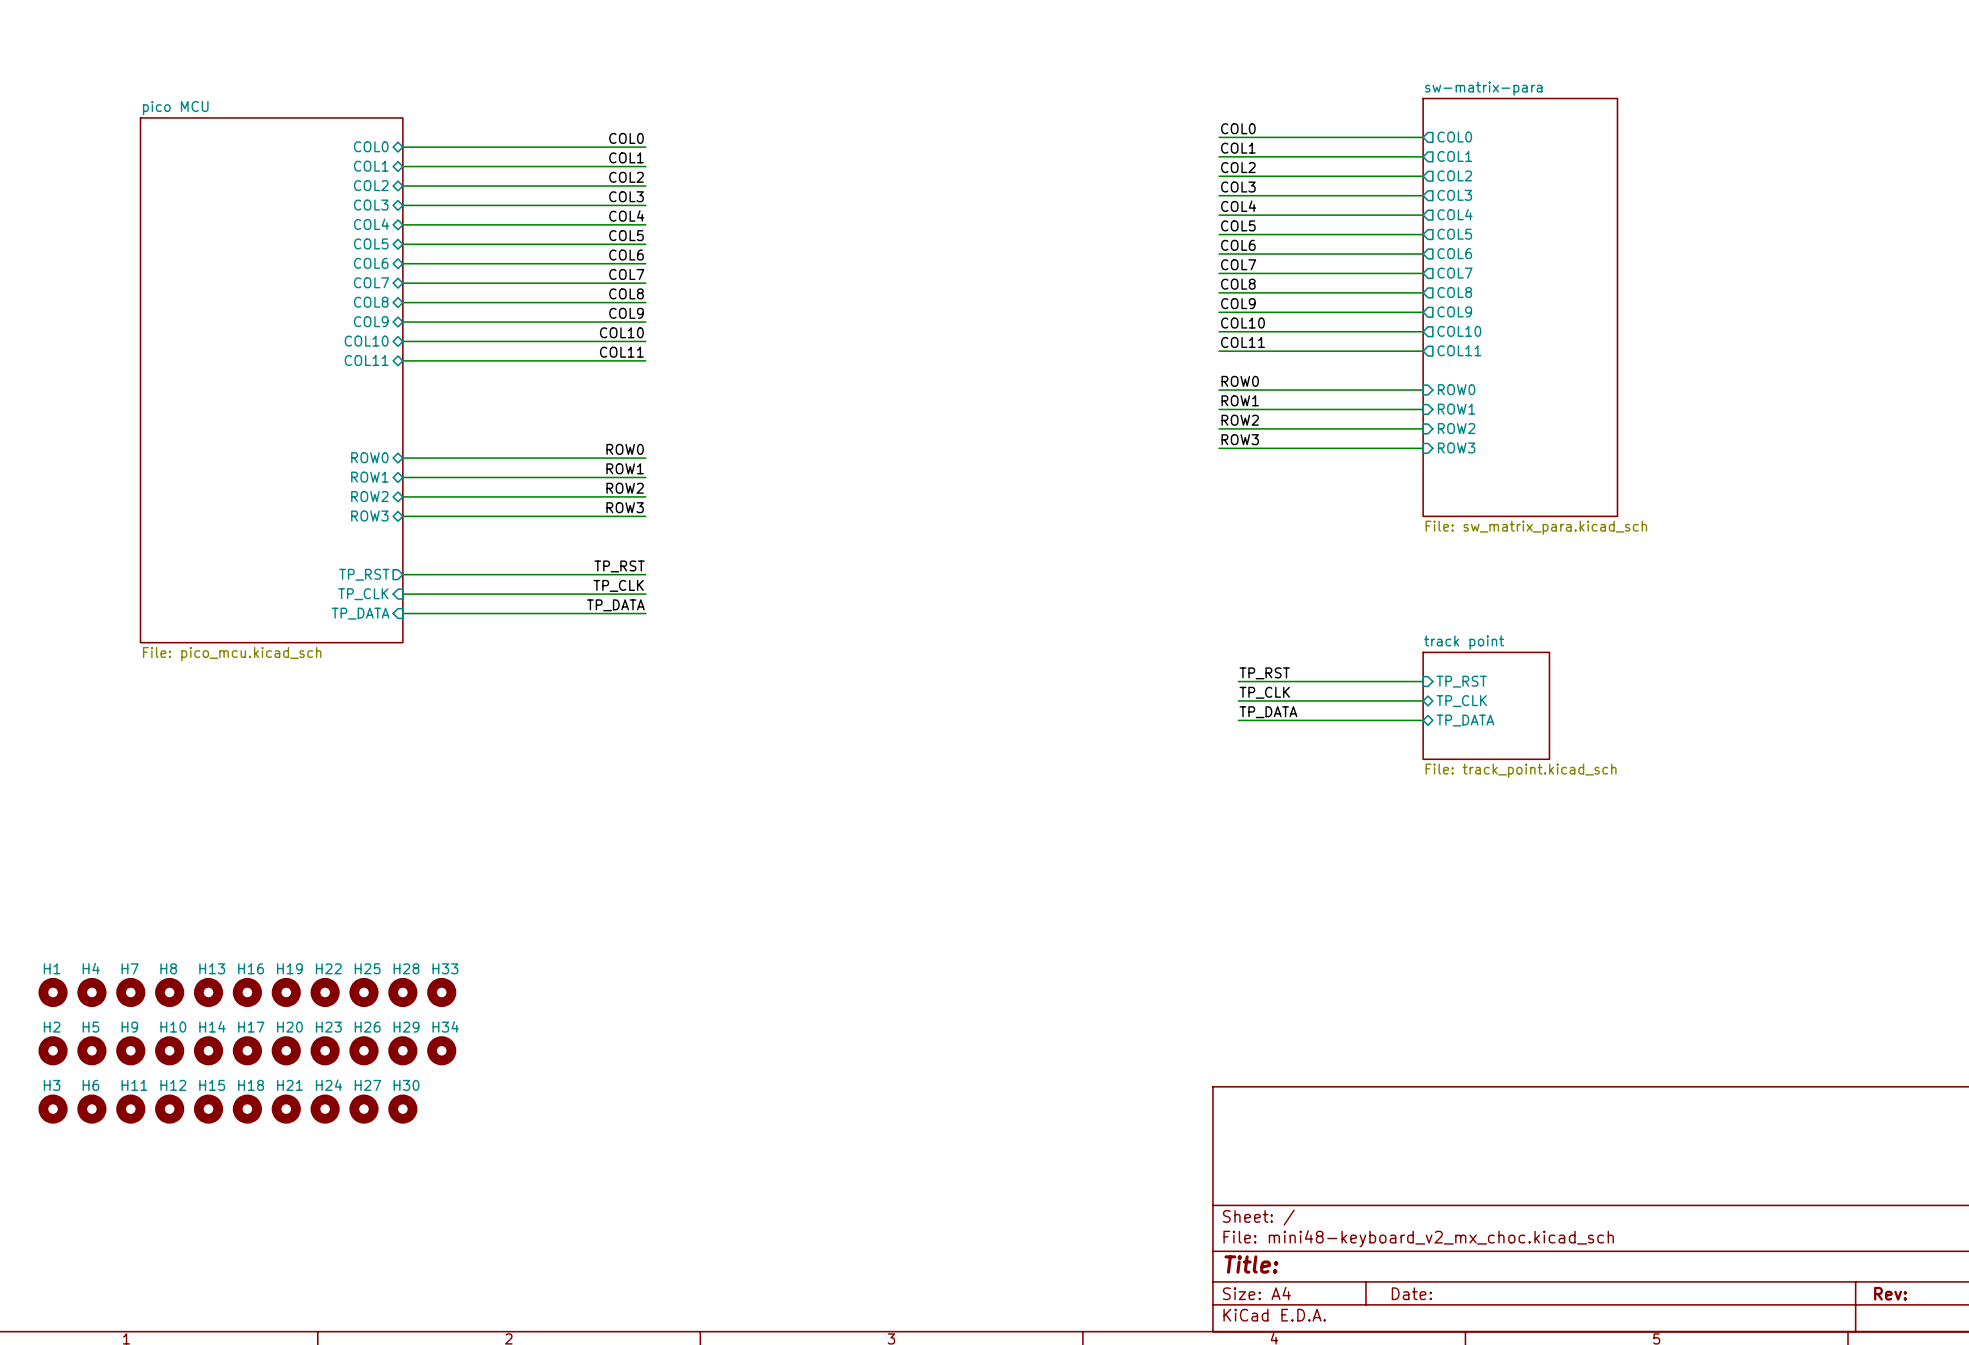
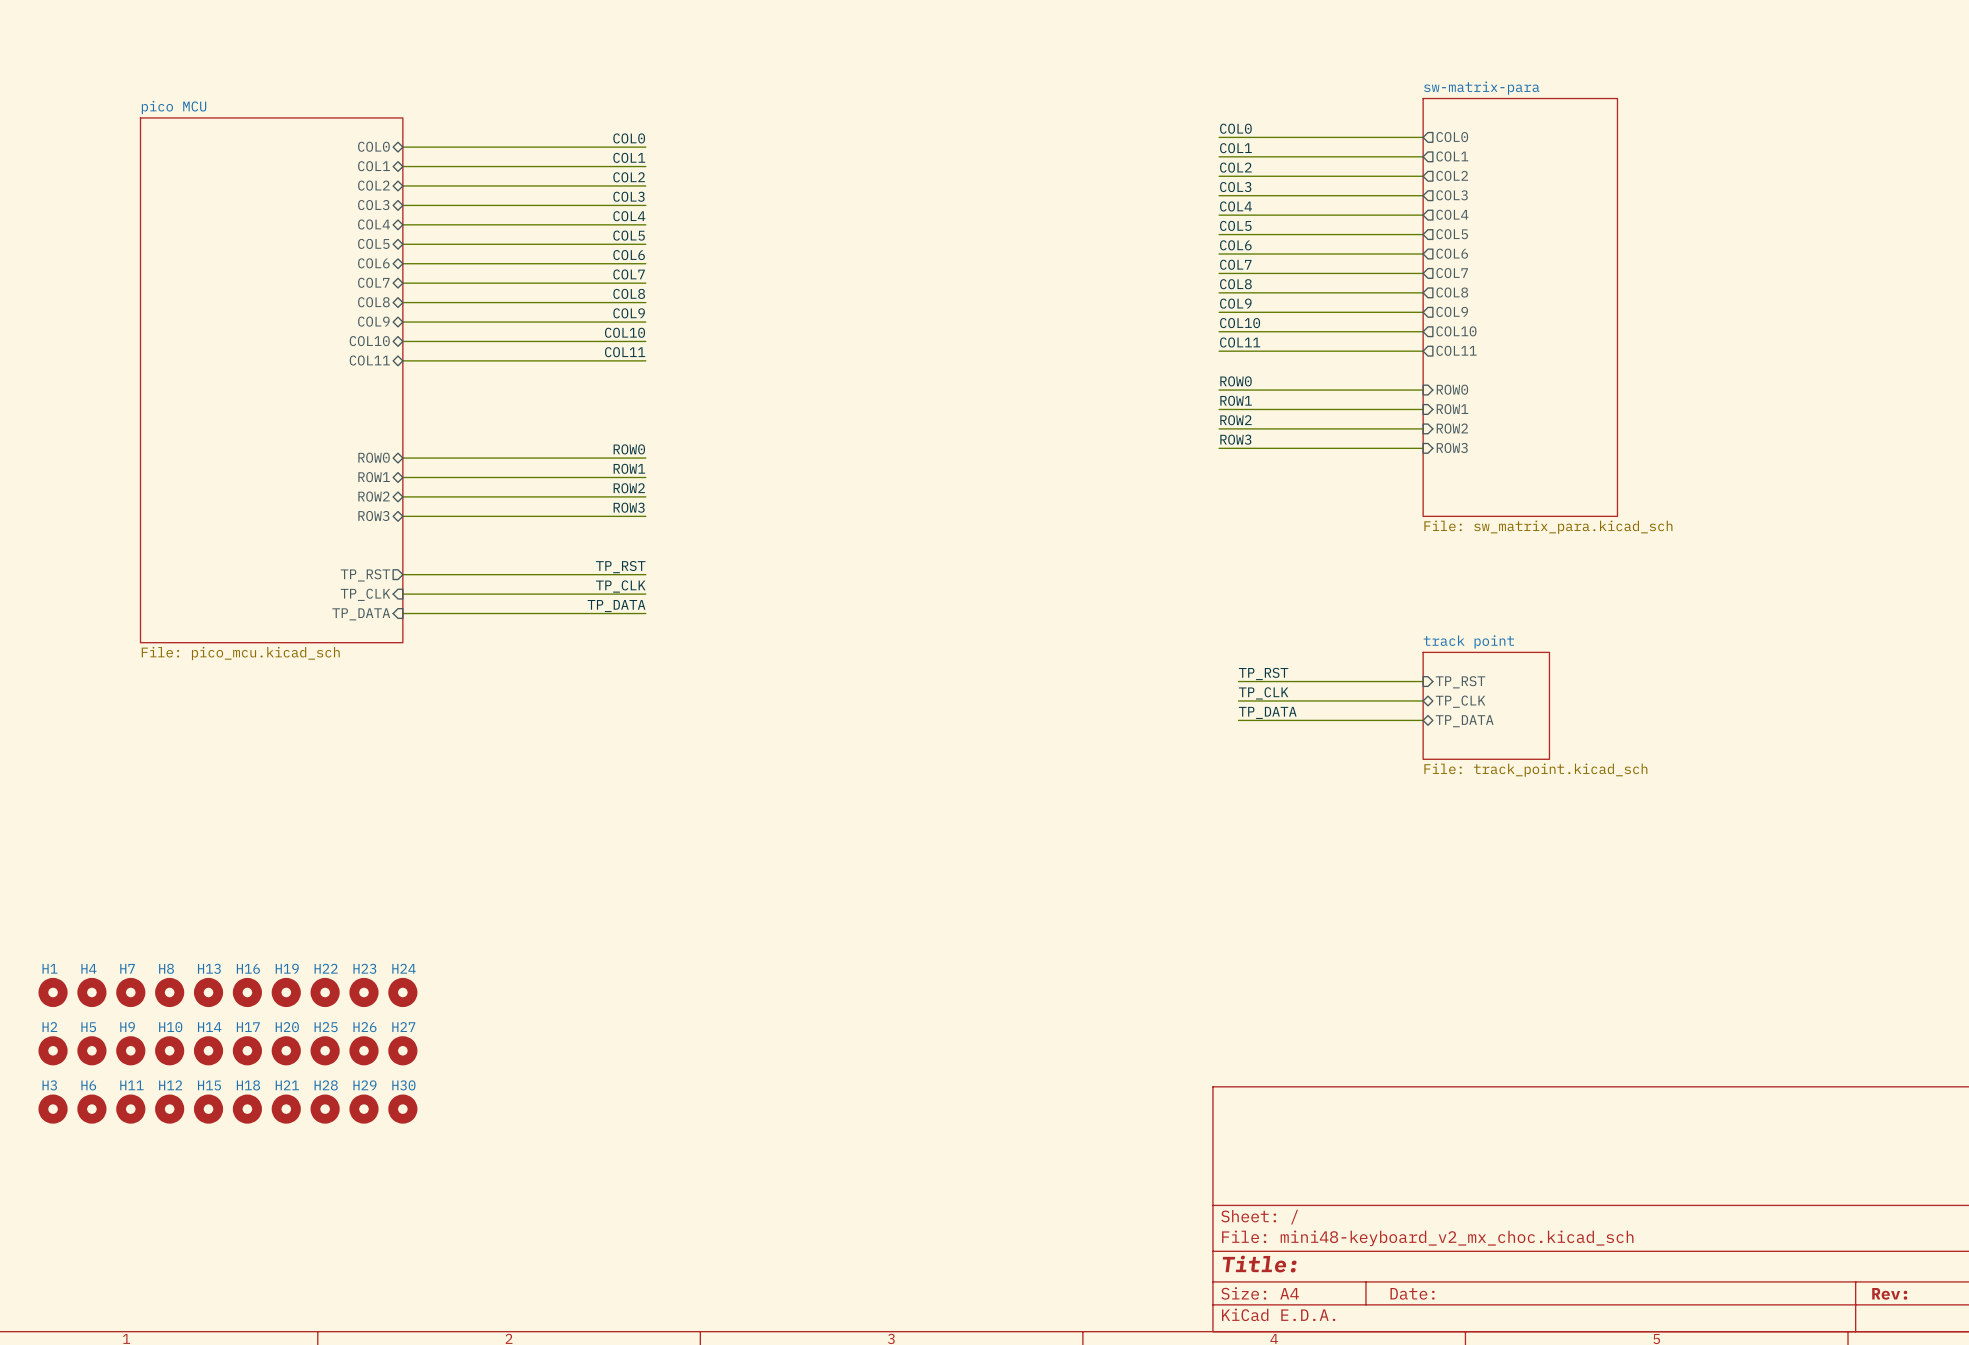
H25 name: H25 (367, 968) -> H23 (364, 968)
H28 name: H28 (406, 968) -> H24 (404, 968)
H33: (441, 992) -> none
H23 name: H23 (328, 1027) -> H25 (326, 1027)
H29 name: H29 (406, 1027) -> H27 (403, 1027)
H34: (441, 1050) -> none
H24 name: H24 (329, 1085) -> H28 (326, 1085)
H27 name: H27 (367, 1085) -> H29 (364, 1085)

